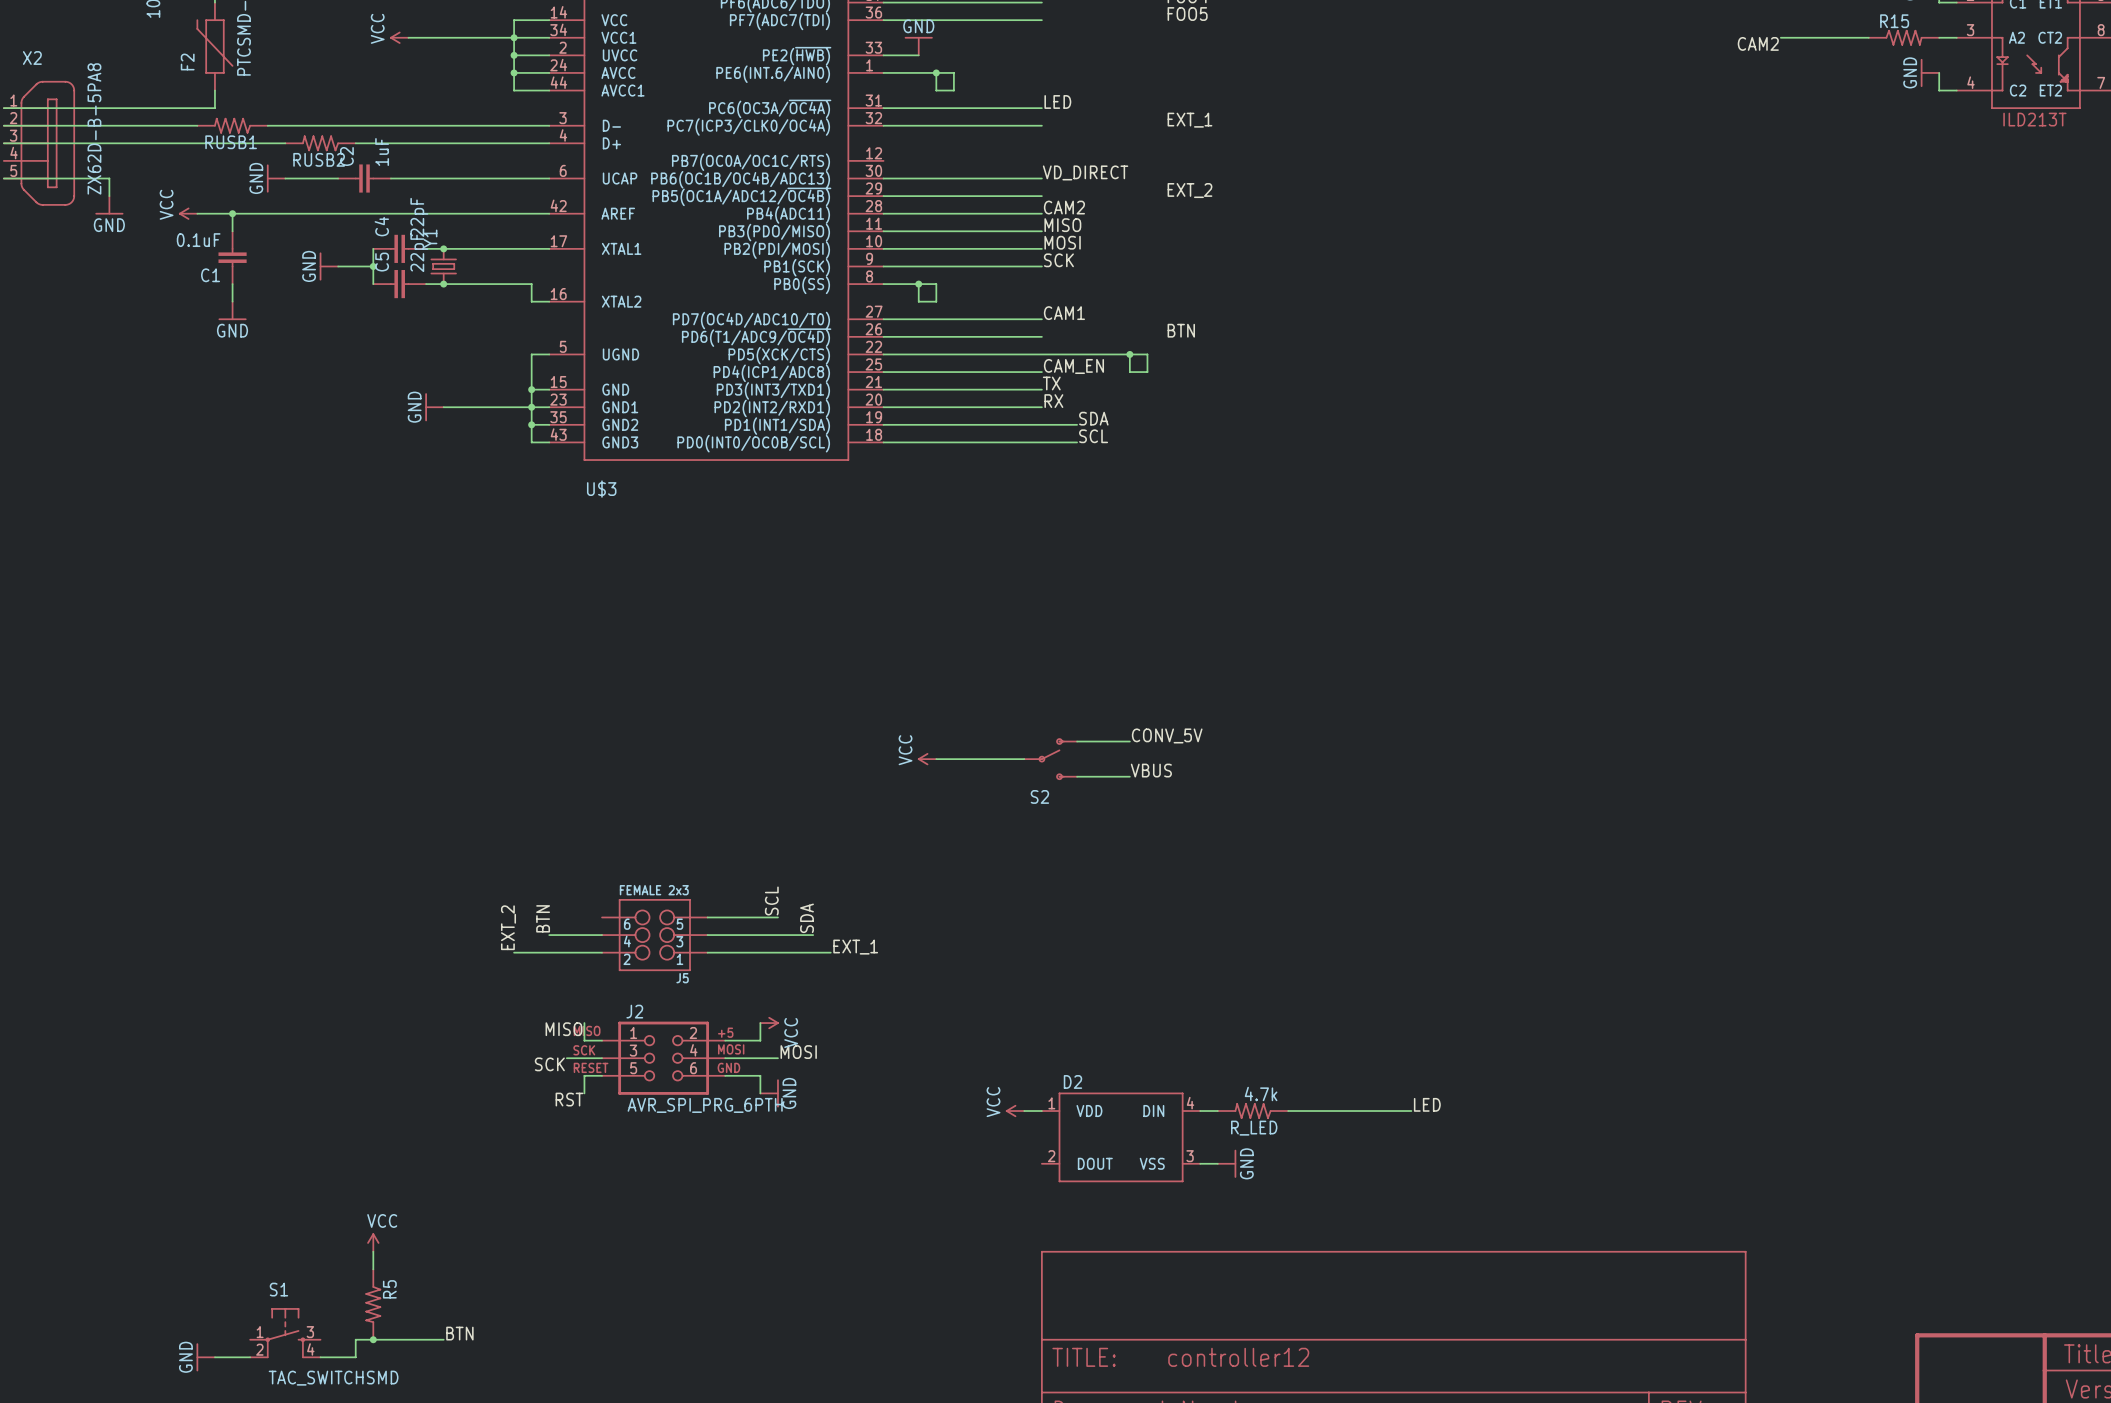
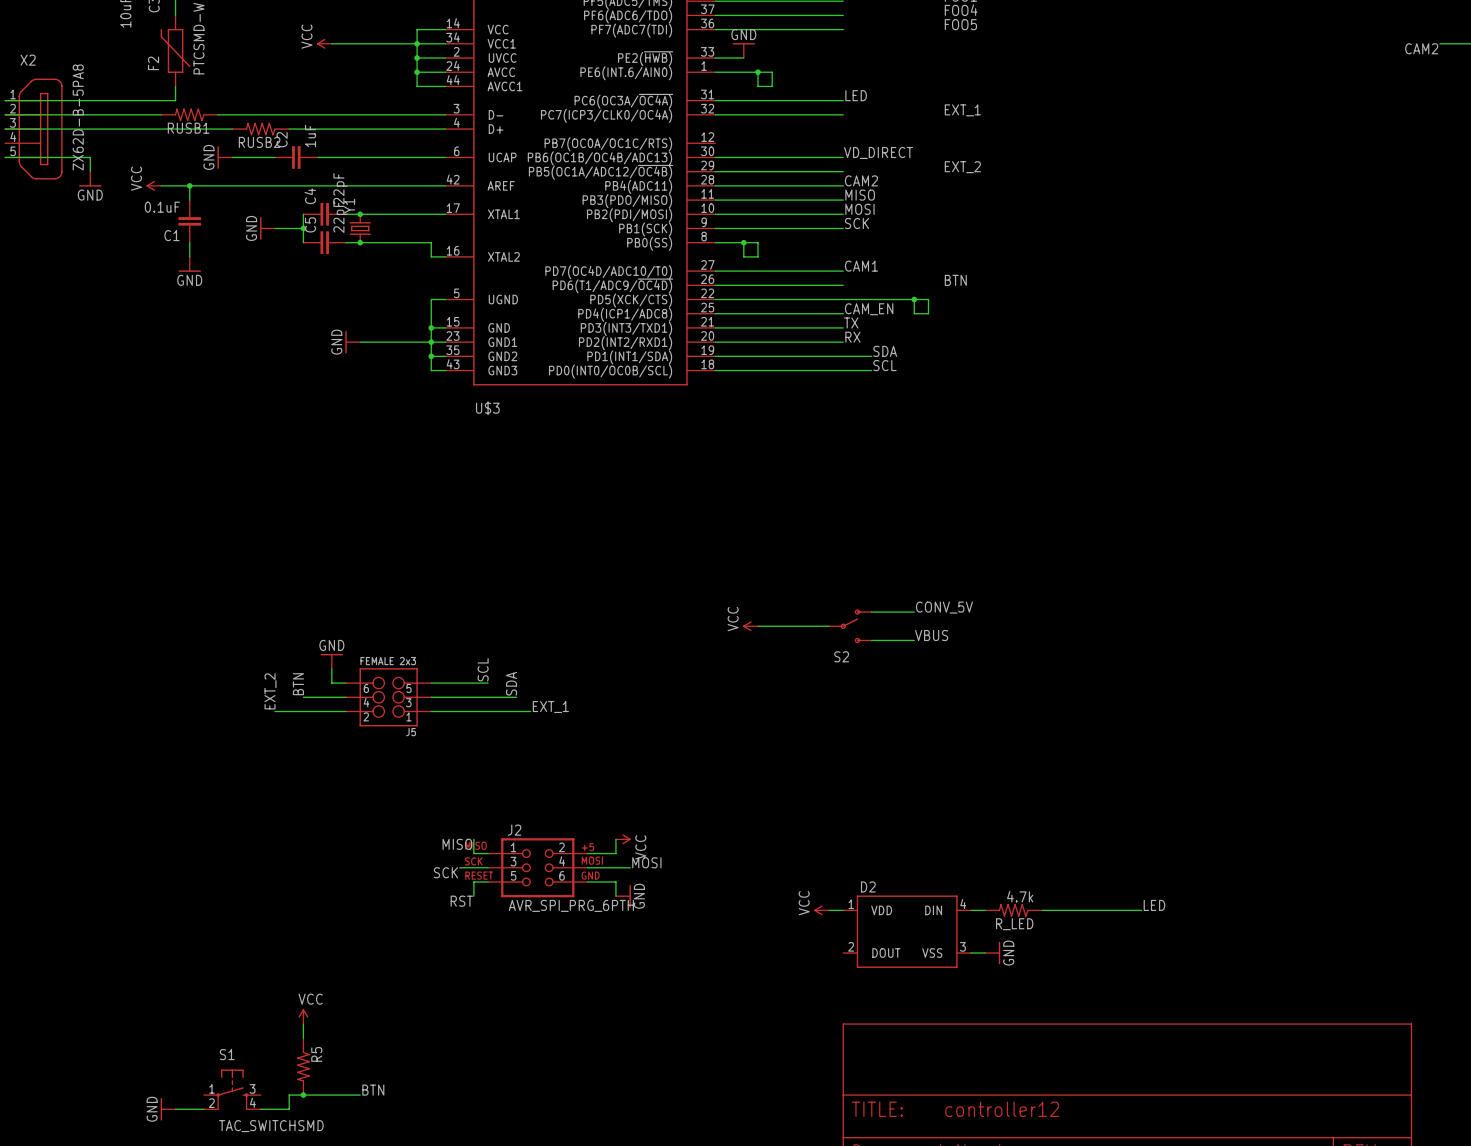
power symbol: none -> GND (331, 661)
wire: none -> (331, 668) (331, 683) (346, 683)
label: none -> SCL (483, 669)
wire: none -> (431, 683) (488, 683)
label: none -> BTN (298, 684)
label: none -> SDA (511, 683)
label: none -> EXT_2 (270, 691)
wire: none -> (303, 697) (346, 697)
wire: none -> (431, 697) (516, 697)
label: none -> EXT_1 (550, 707)
wire: none -> (275, 711) (346, 711)
wire: none -> (431, 711) (530, 711)
label: SCL (771, 900) -> none
wire: (707, 917) (777, 917) -> none
label: BTN (543, 918) -> none
label: SDA (807, 918) -> none
label: EXT_2 (508, 927) -> none
wire: (549, 935) (602, 935) -> none
J5 position: (654, 935) -> (388, 697)
wire: (707, 935) (813, 935) -> none
label: EXT_1 (855, 947) -> none
wire: (514, 952) (602, 952) -> none
wire: (707, 952) (830, 952) -> none

